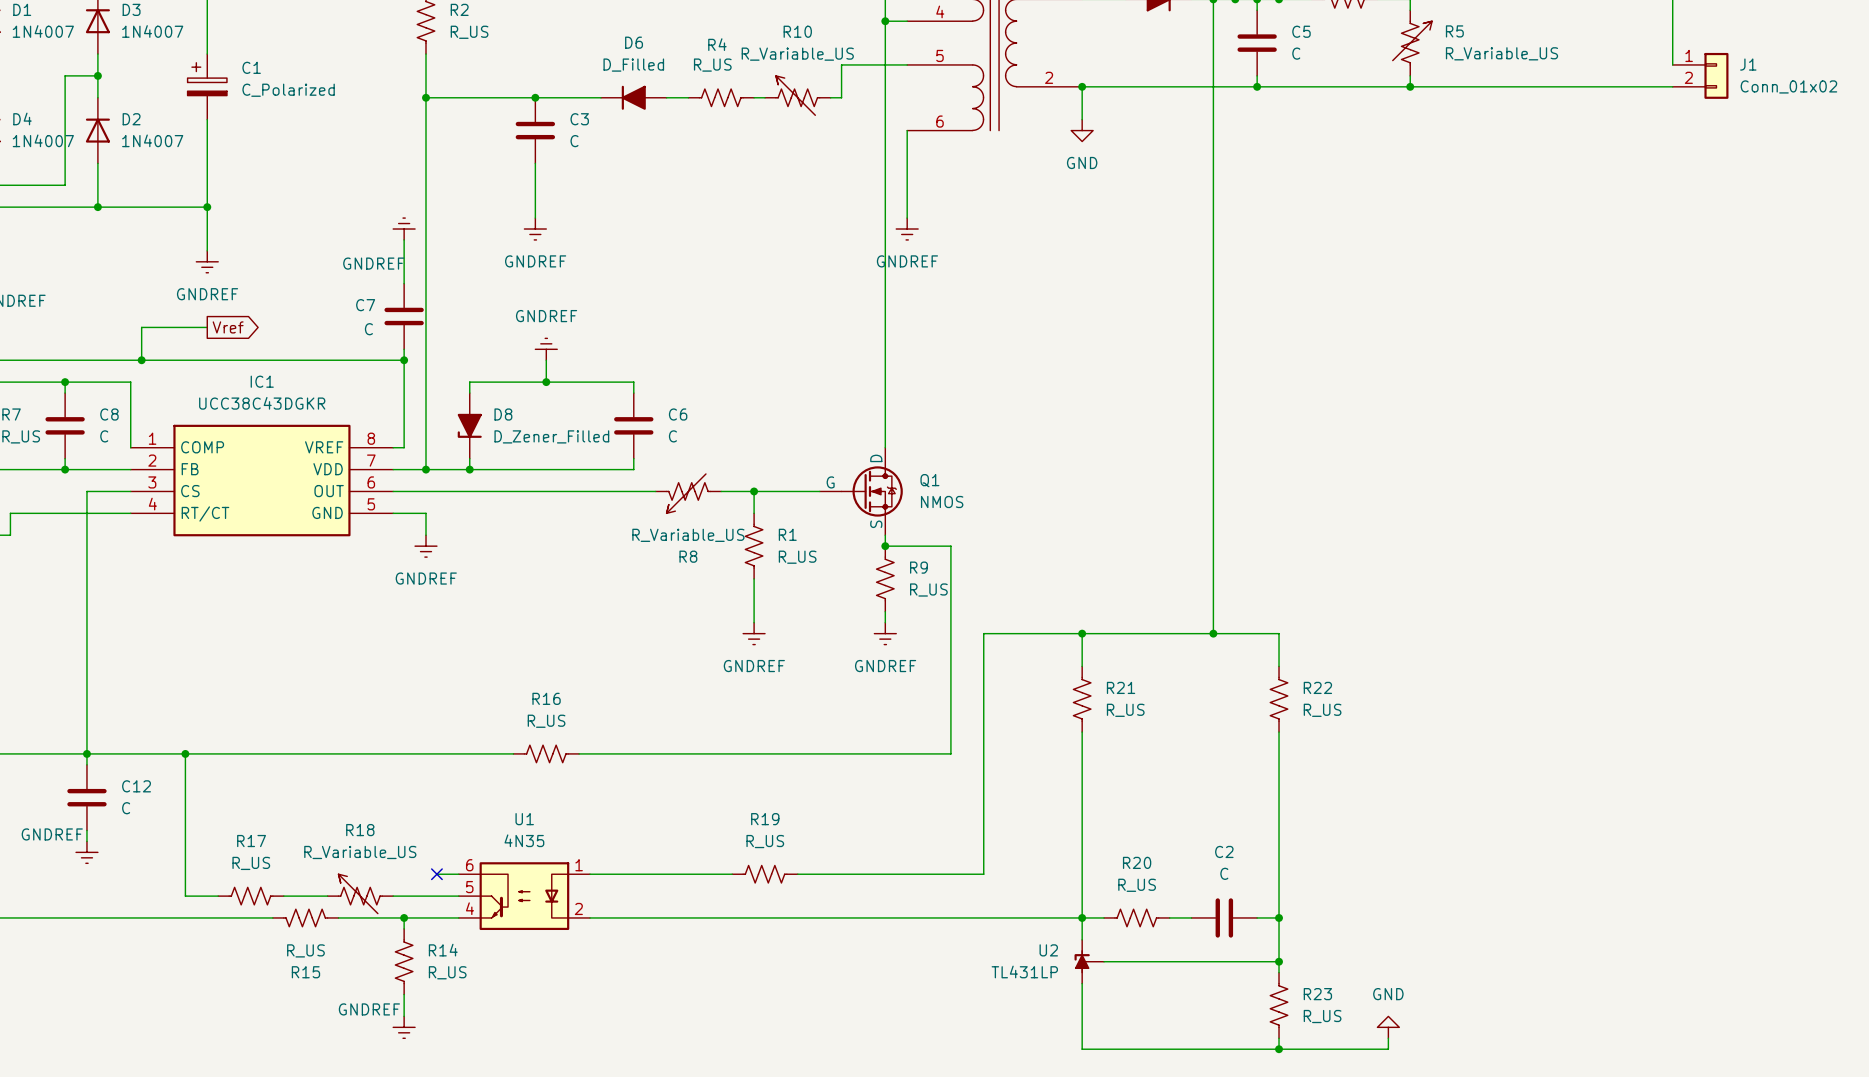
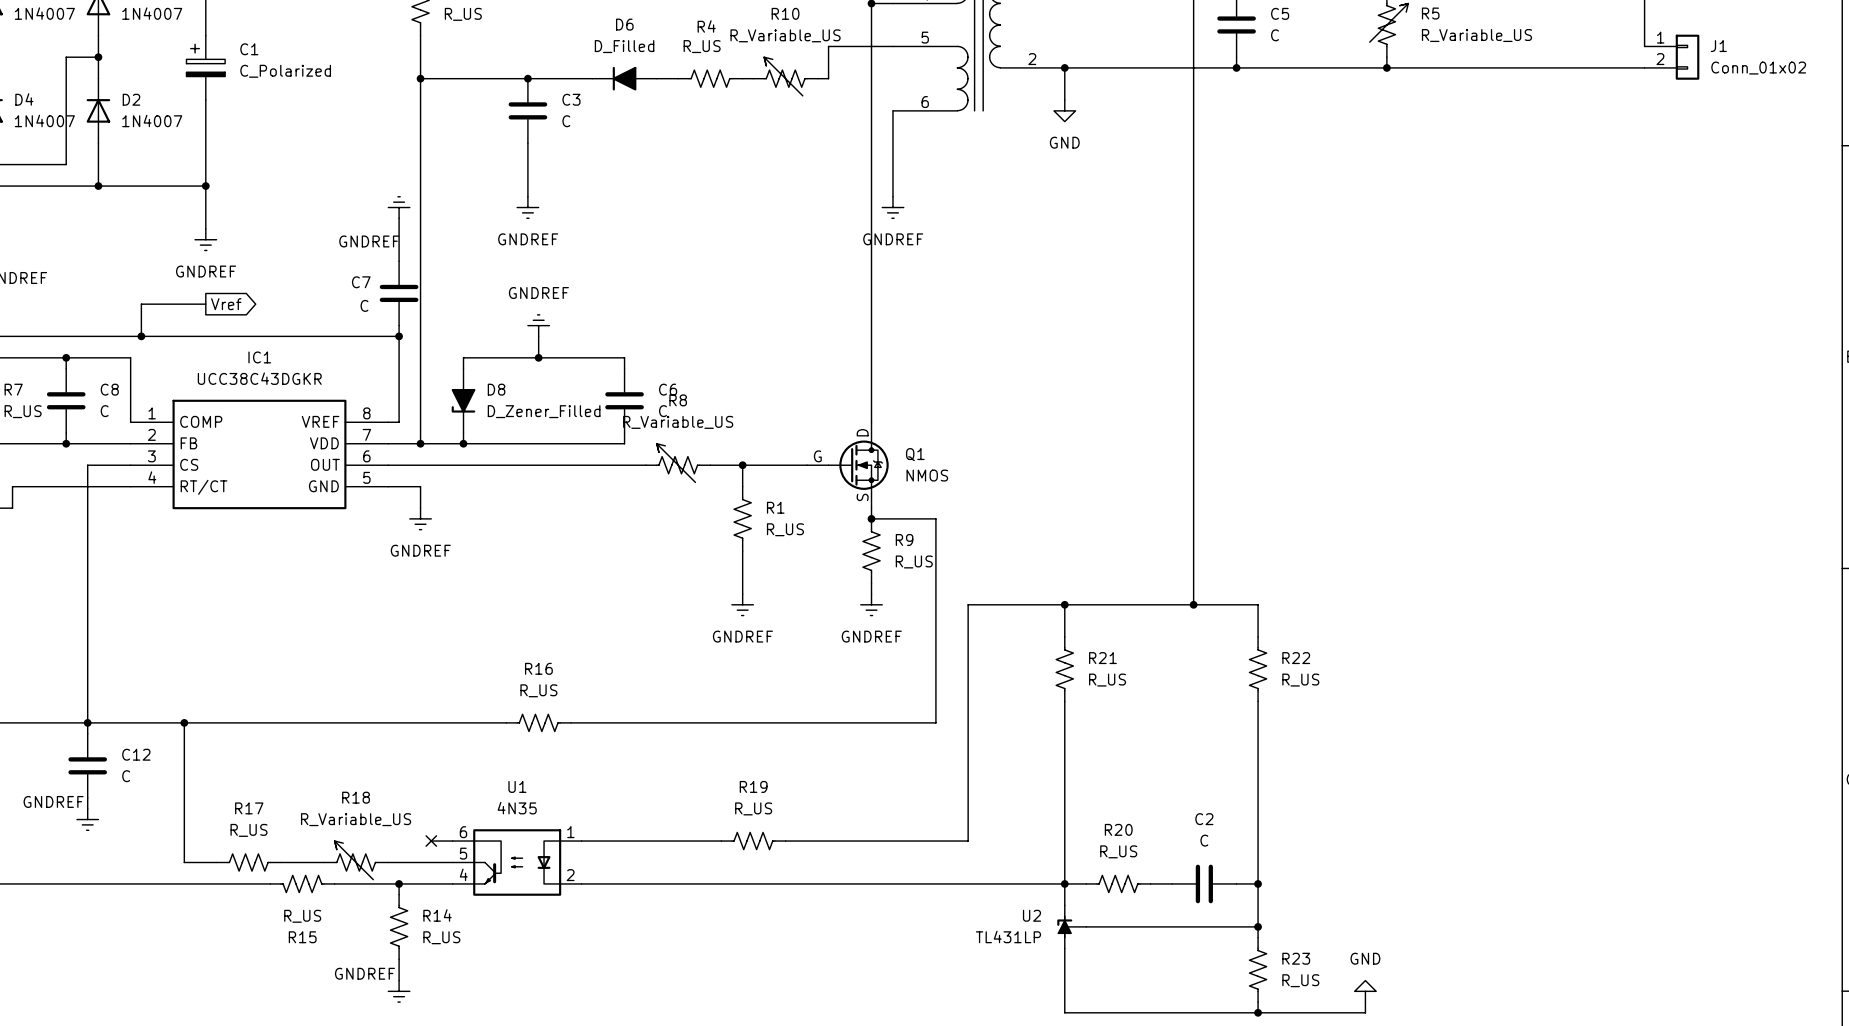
R8 flip: as is (688, 493) -> up-down (677, 463)

